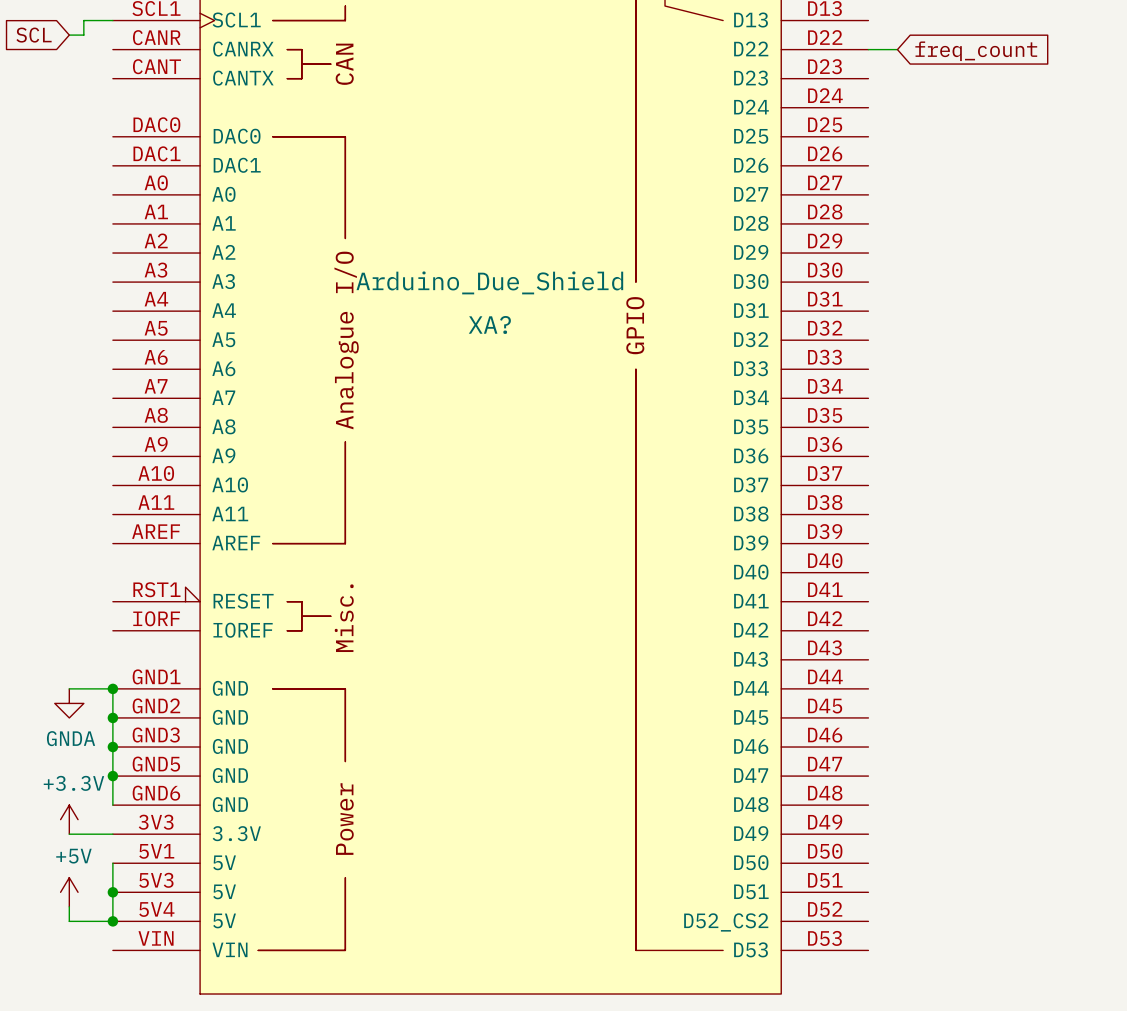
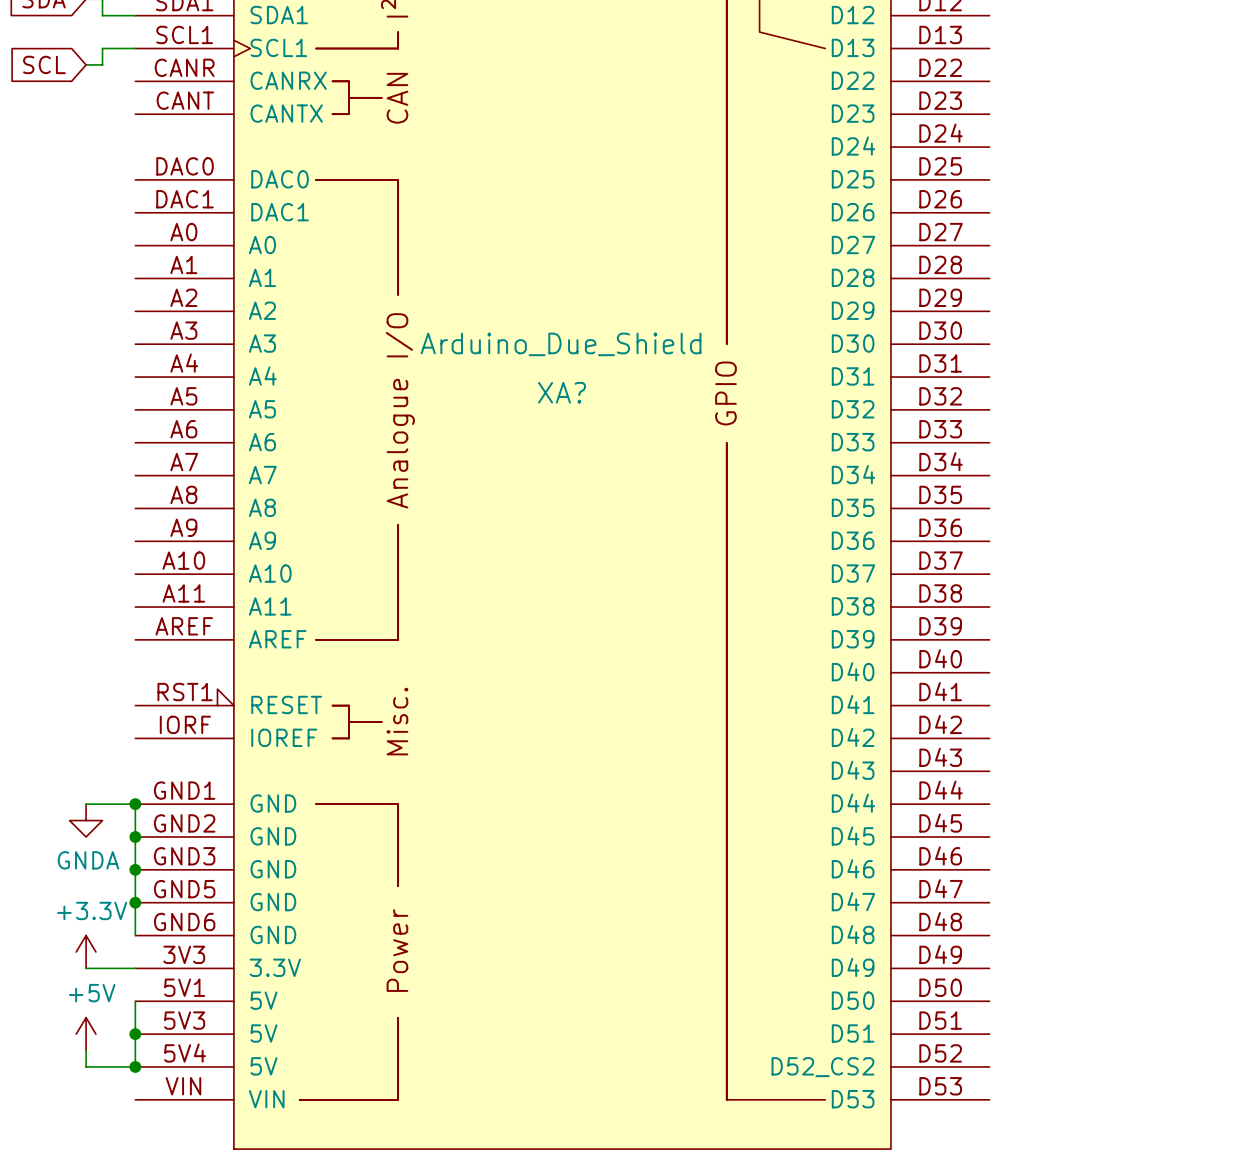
wire: (868, 49) (897, 49) -> none
global label: freq_count (976, 51) -> none

